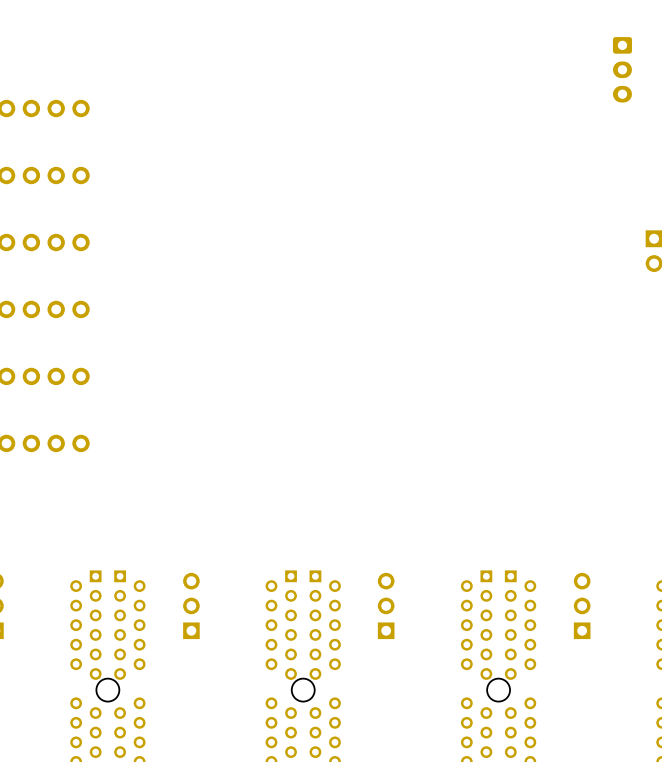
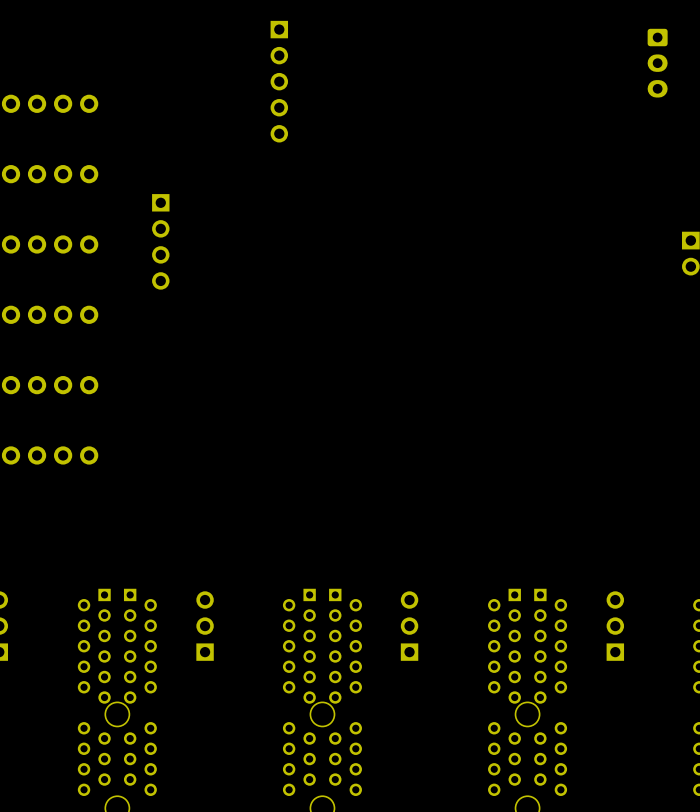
part: none -> (279, 81)
part: none -> (160, 241)

